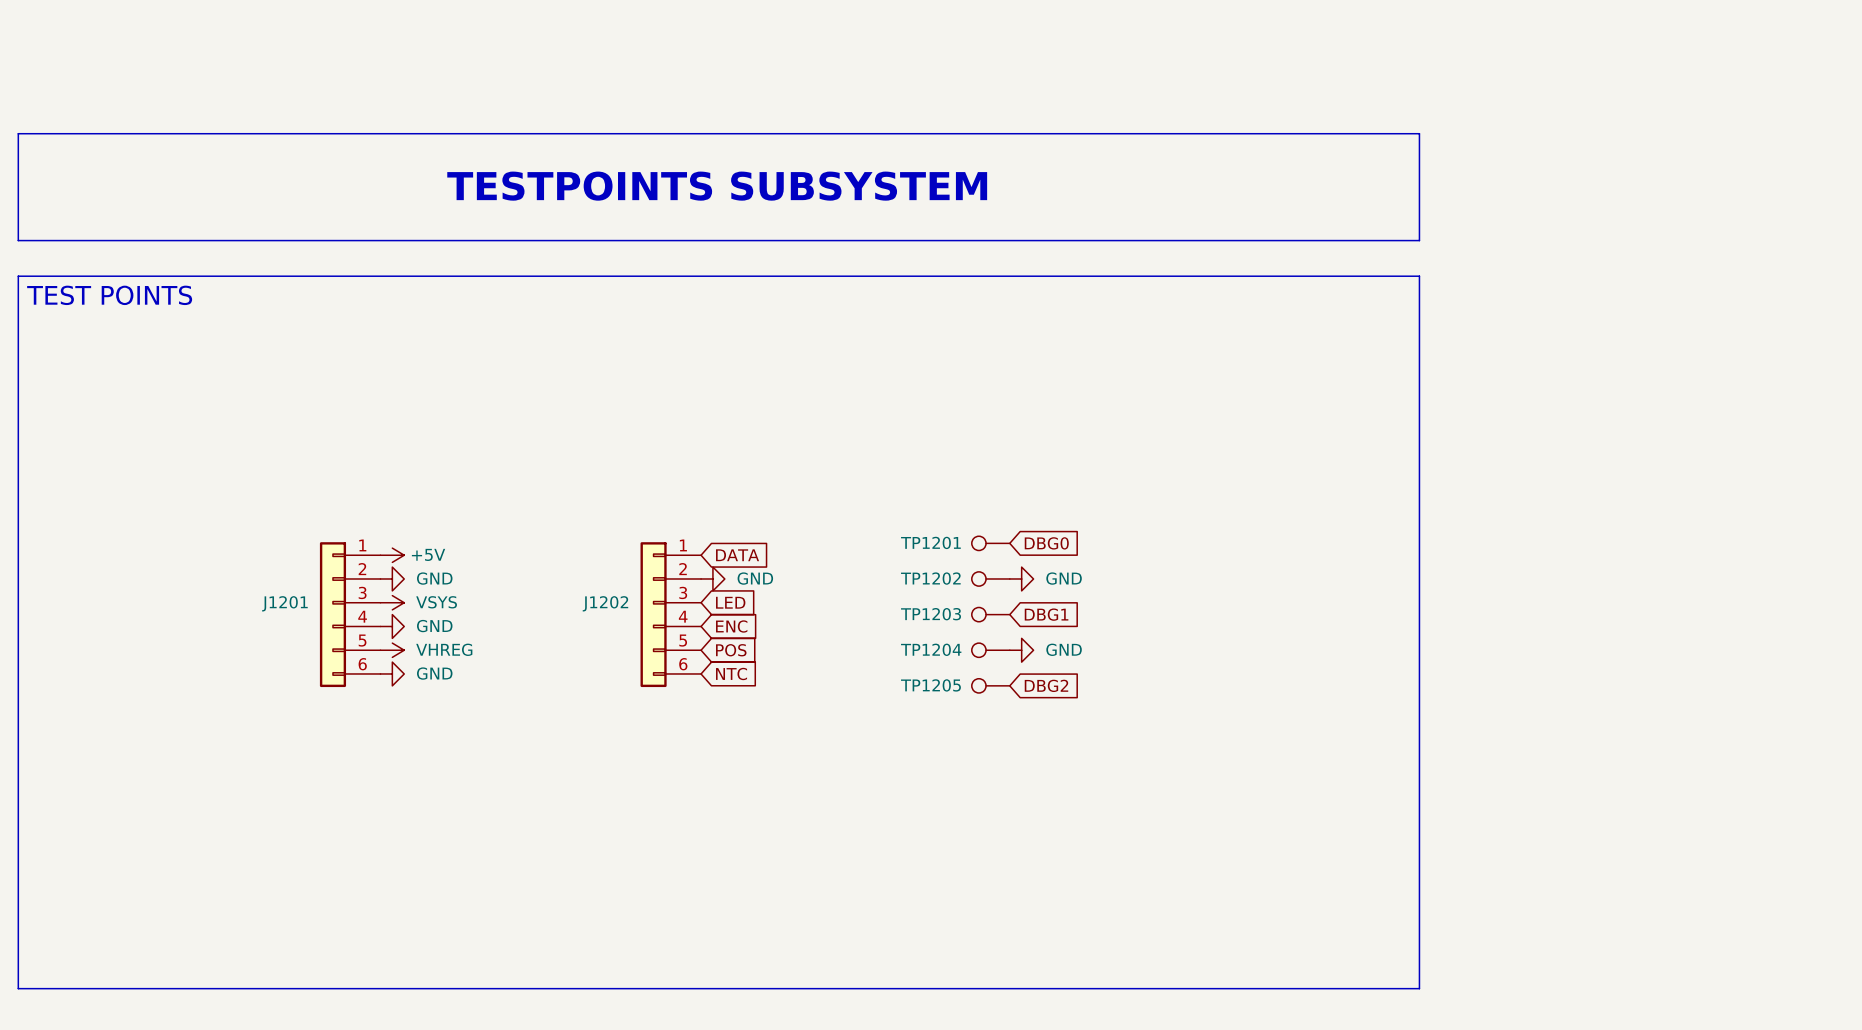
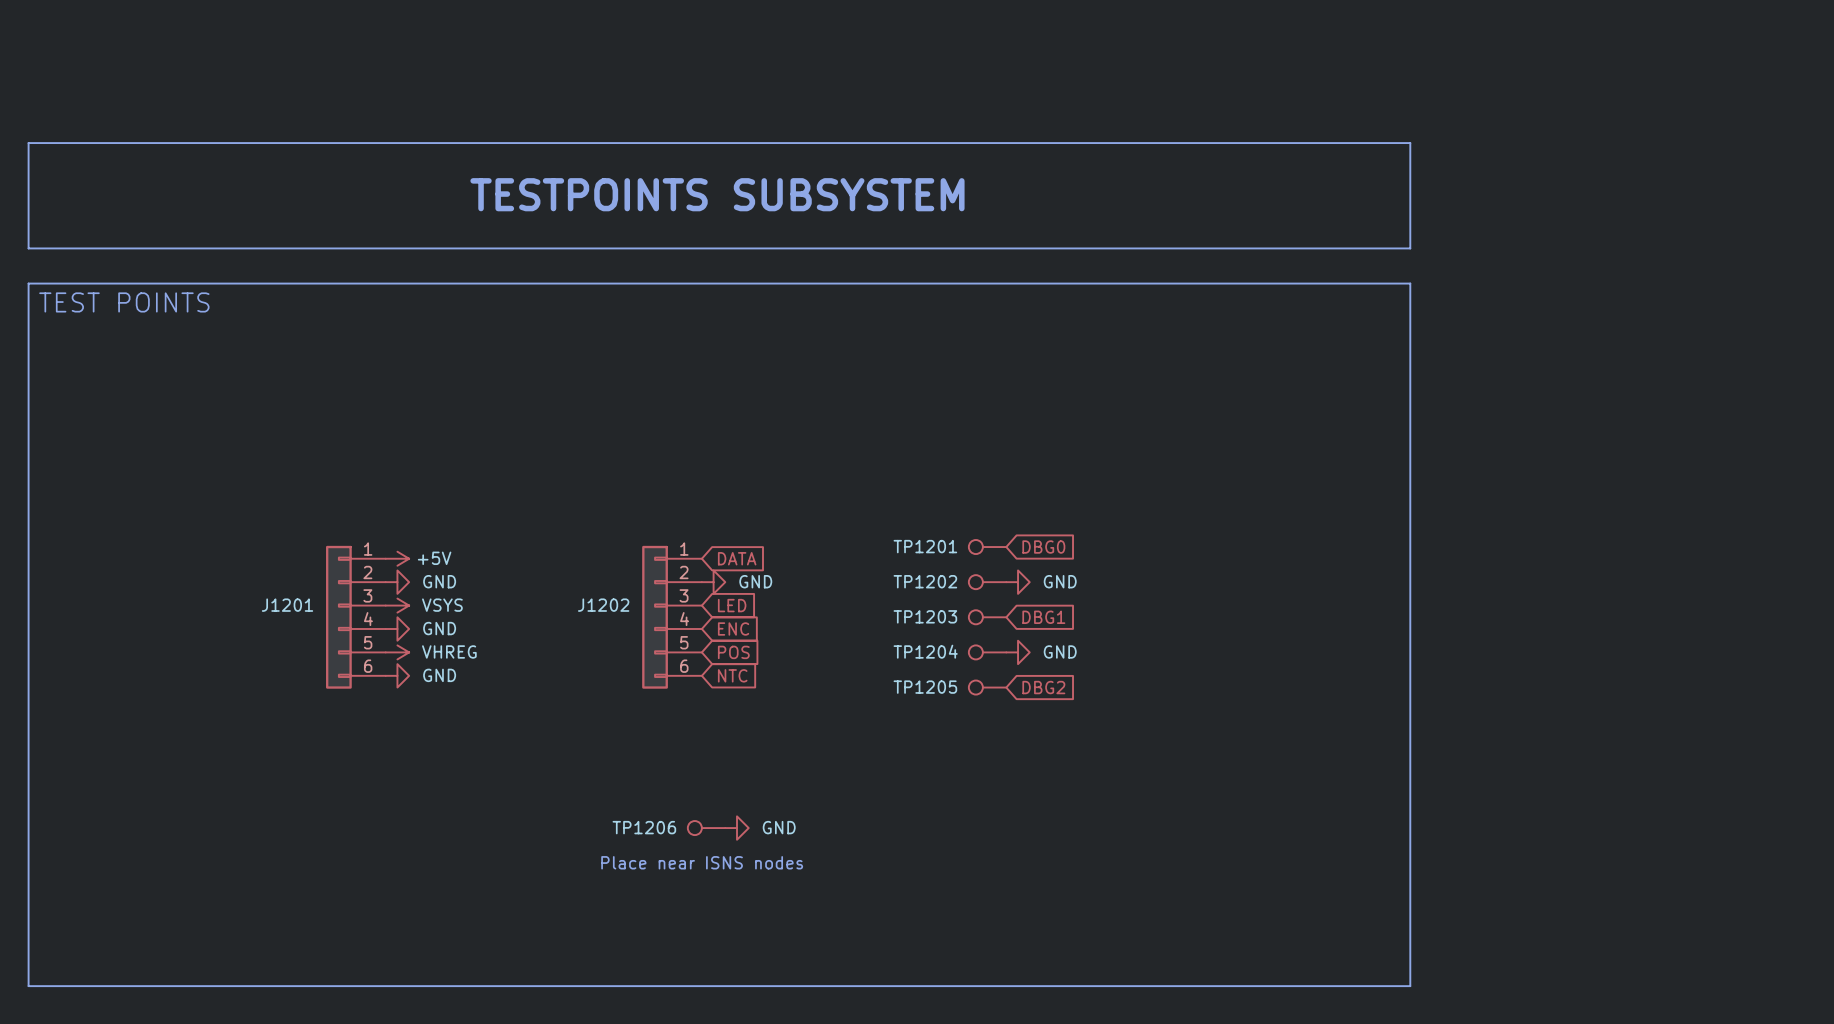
TP1206: none -> (706, 828)
power symbol: none -> GND (737, 828)
text: none -> Place near ISNS nodes (702, 862)

